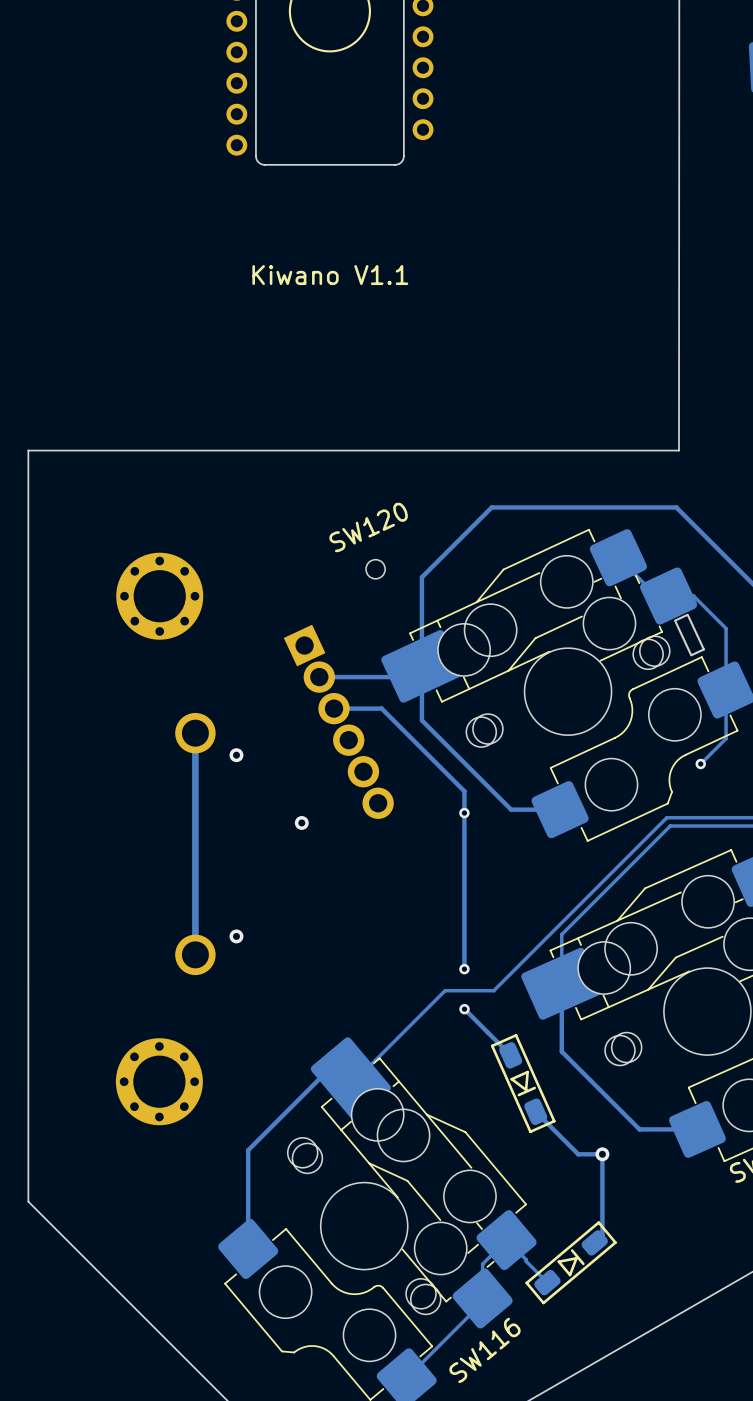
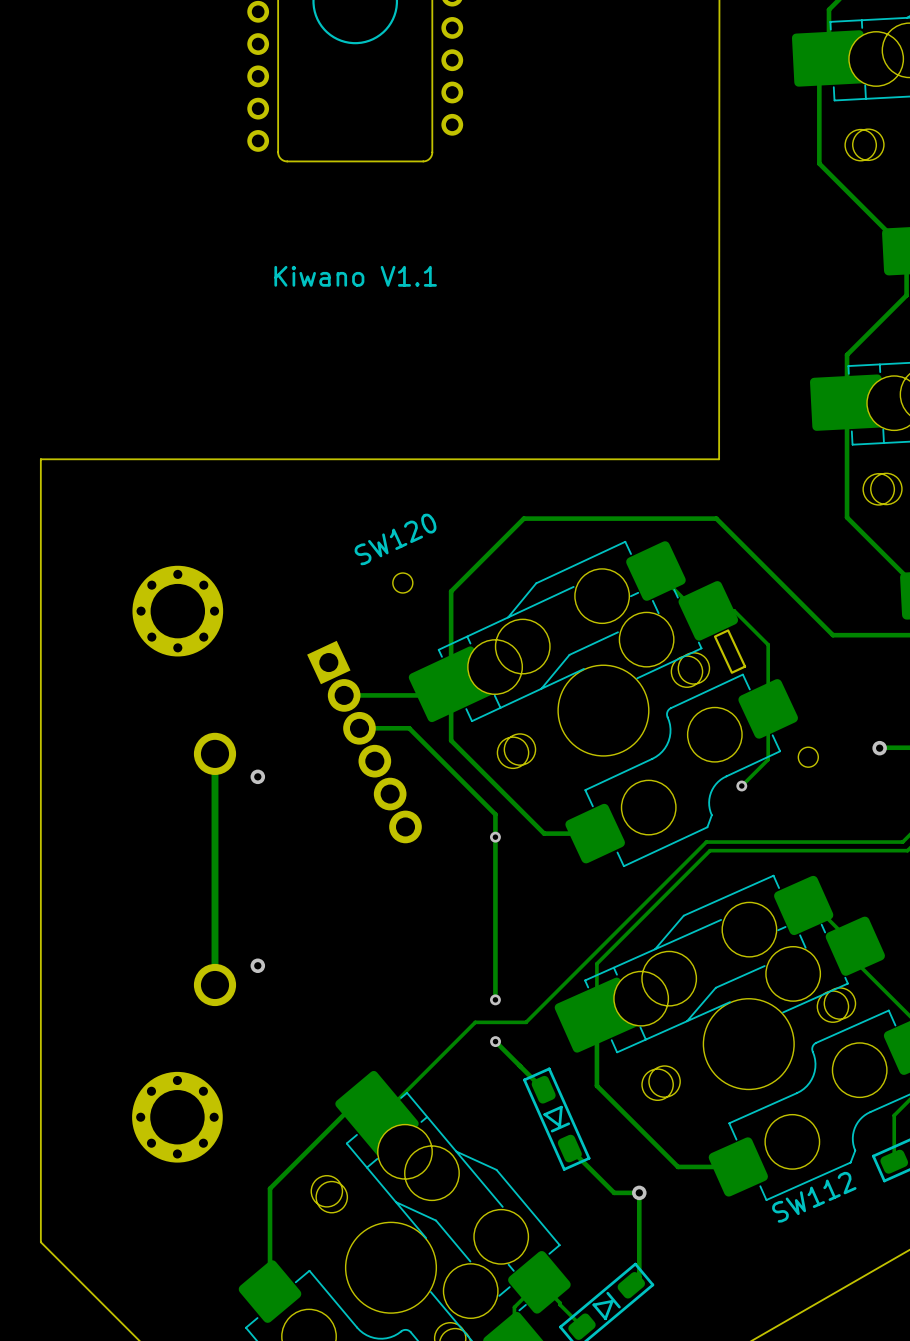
via: (301, 822) -> none

